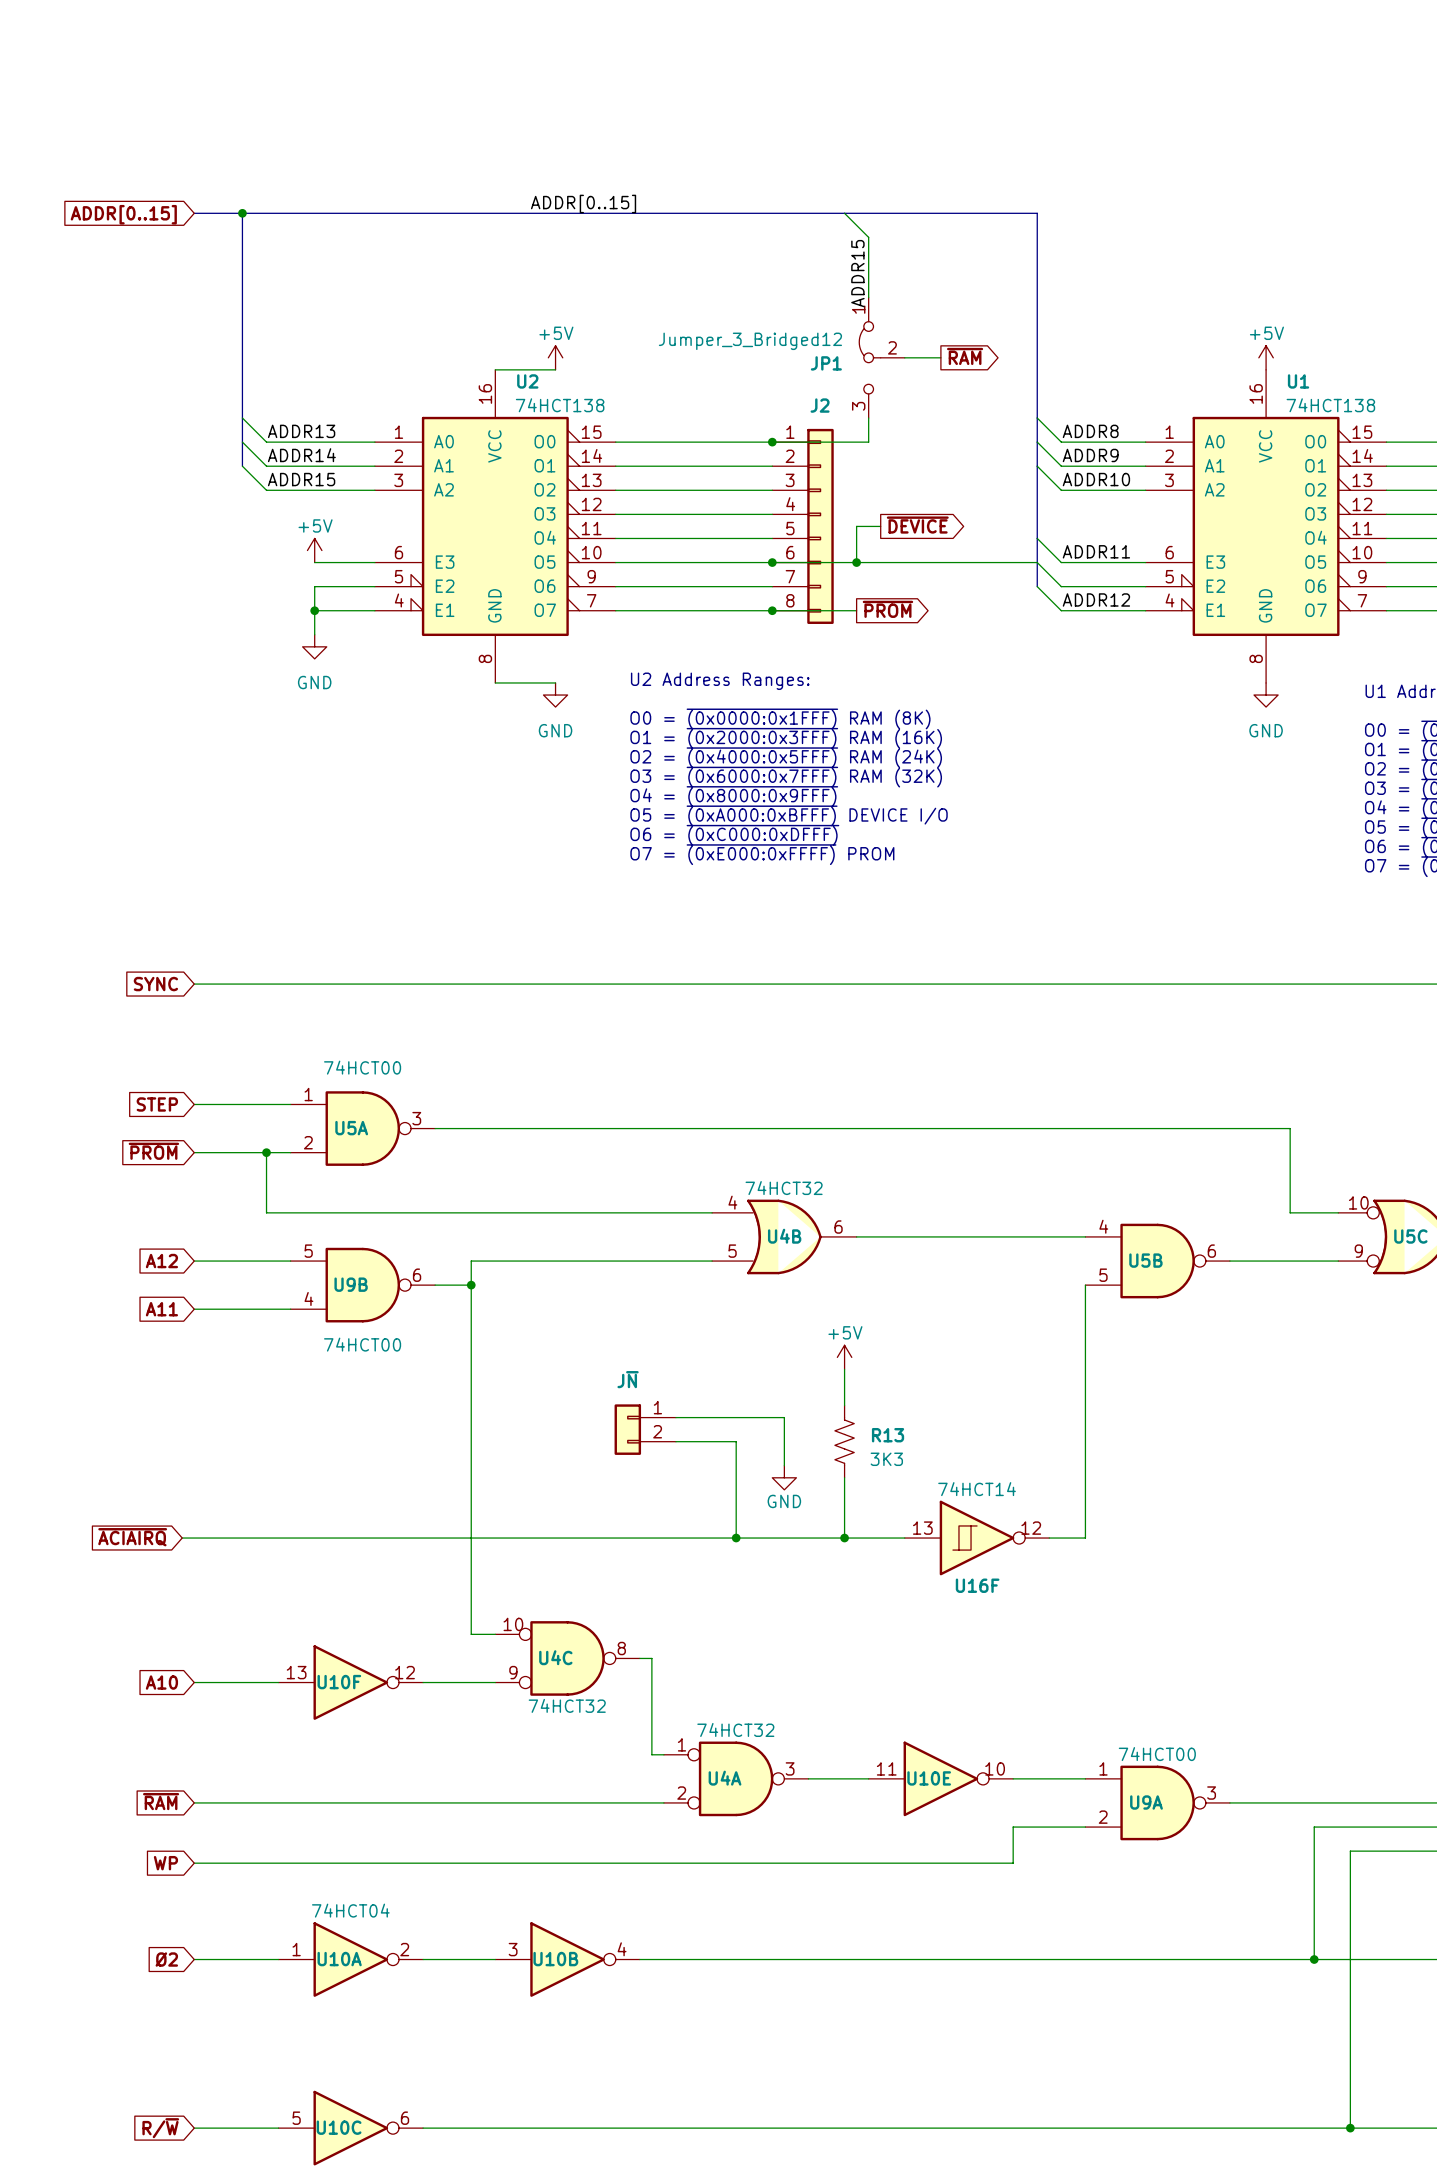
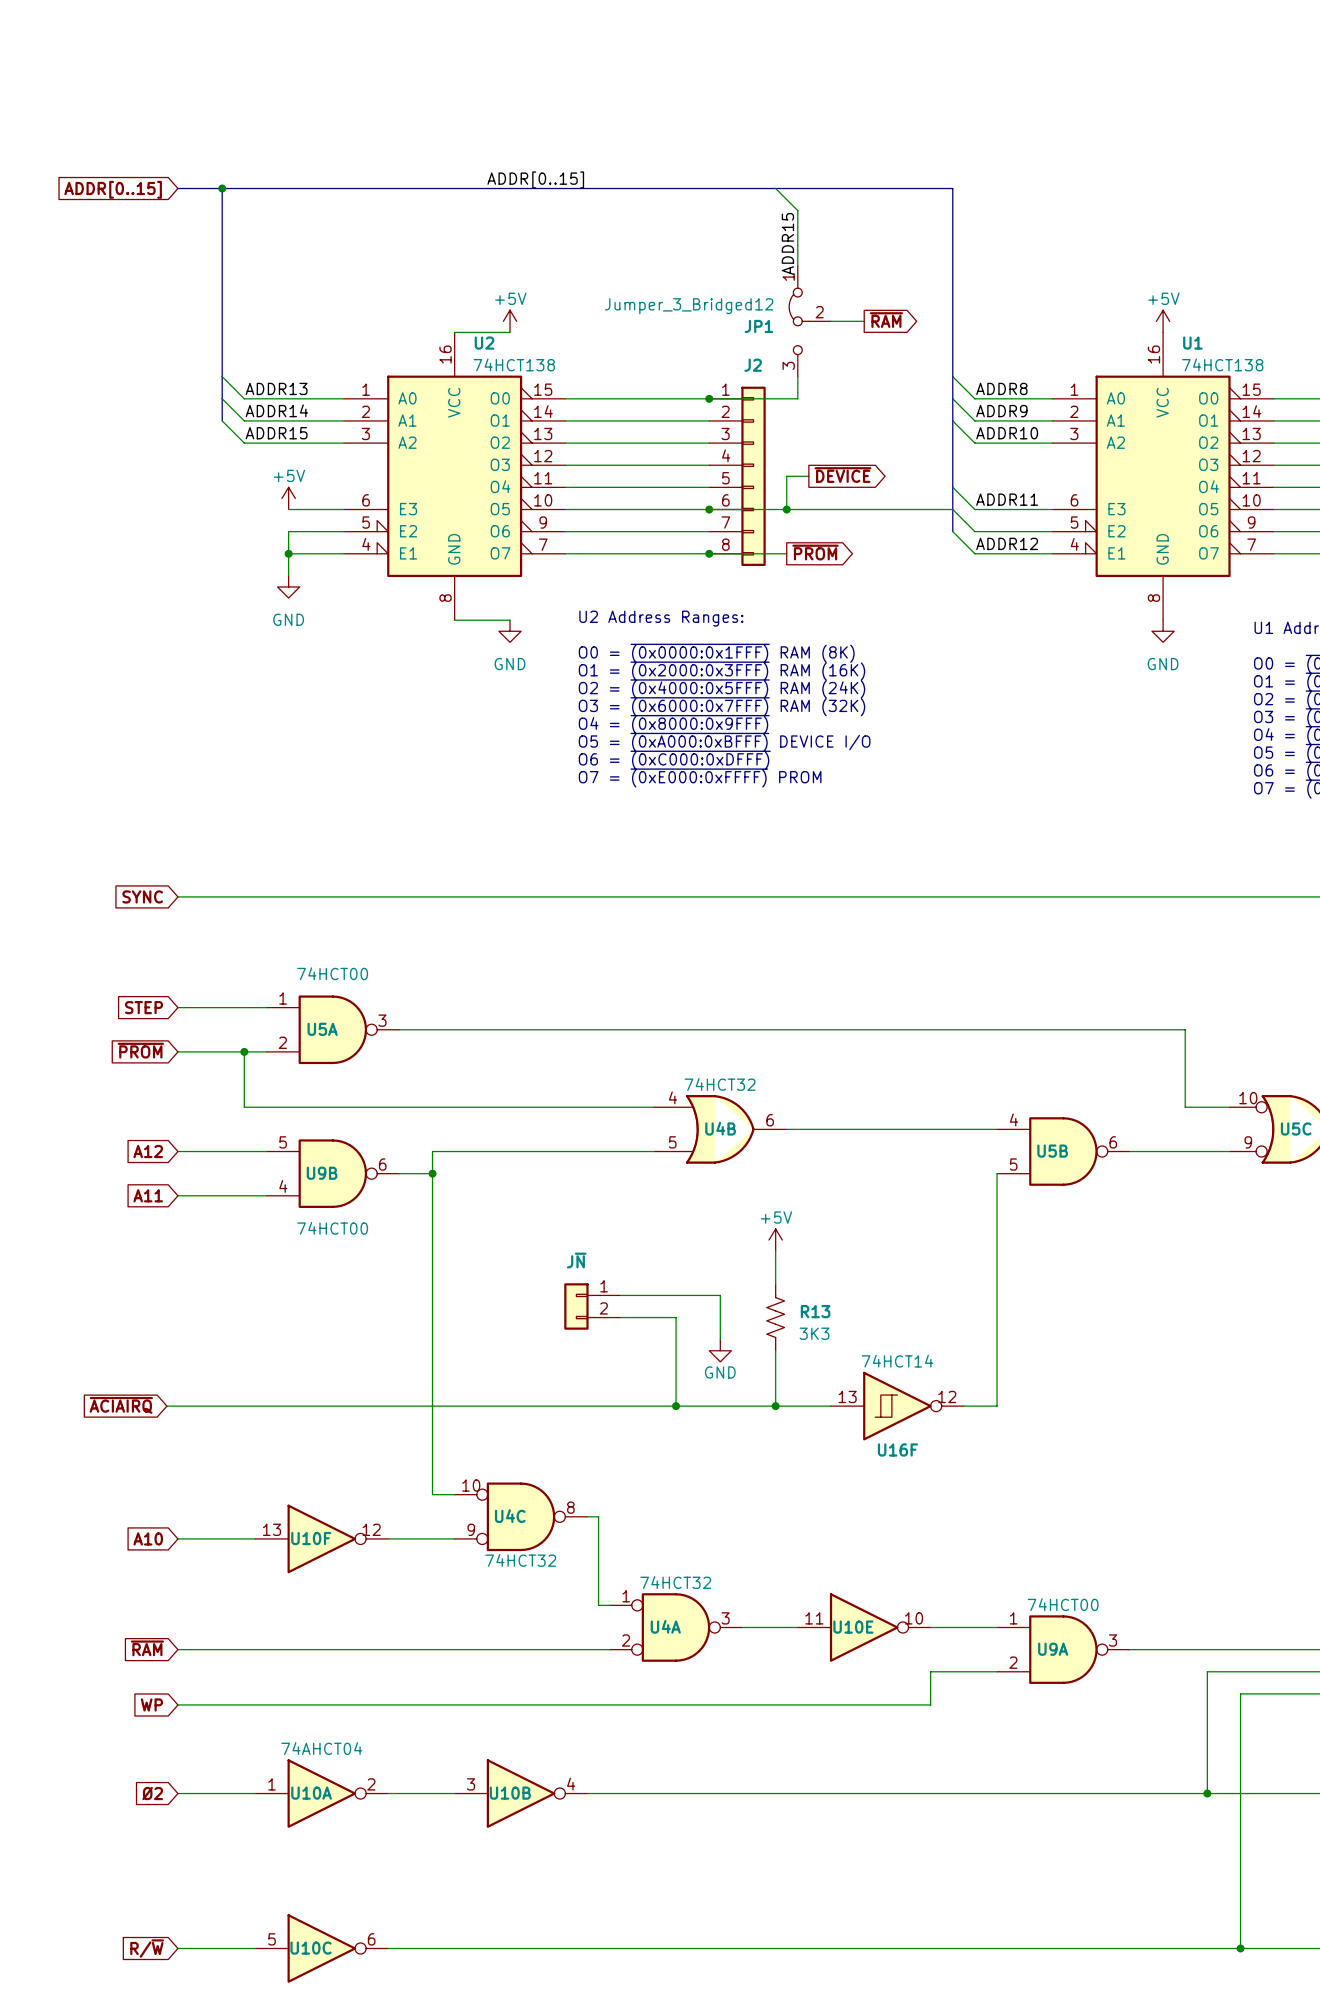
U10A value: 74HCT04 (350, 1910) -> 74AHCT04 (321, 1748)

